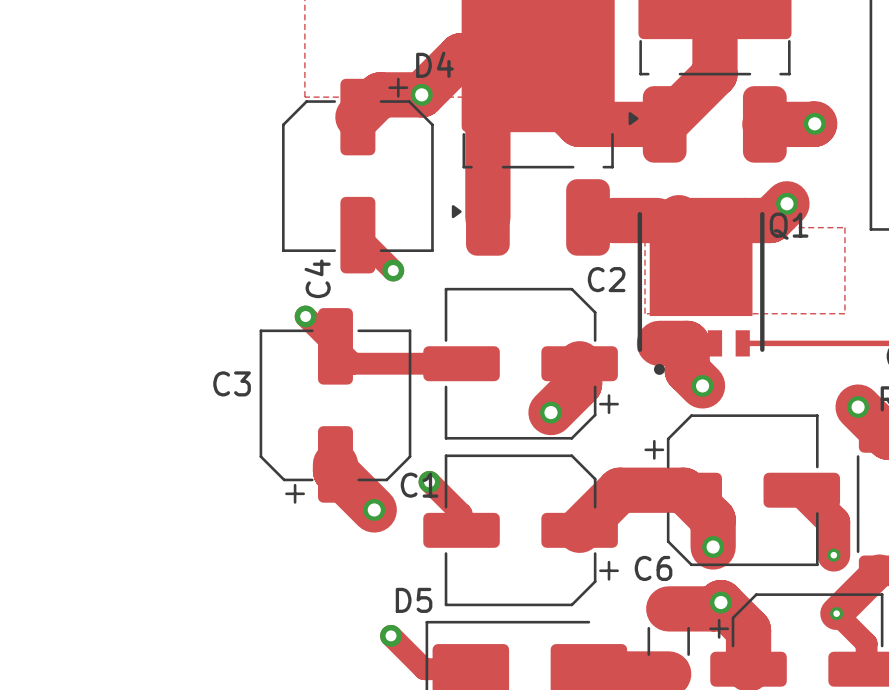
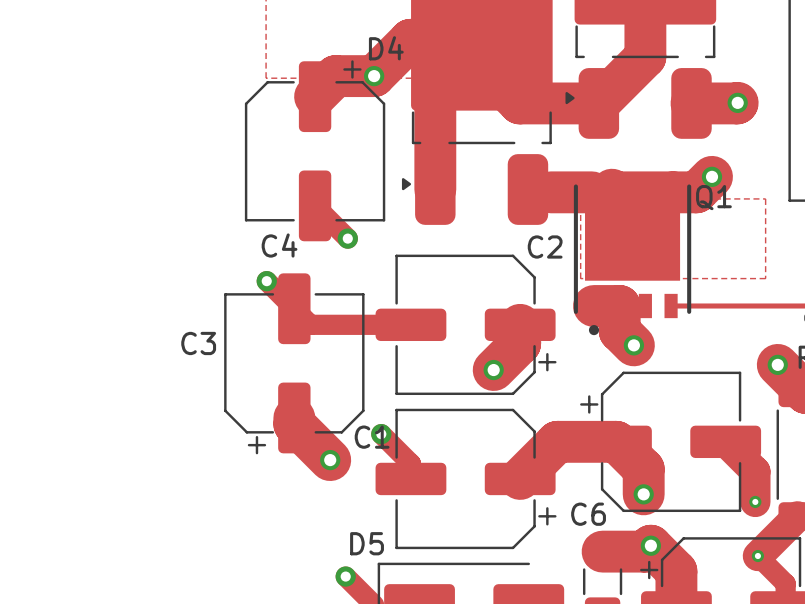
C4 name rotation: 0° (317, 278) -> 90° clockwise (279, 245)

